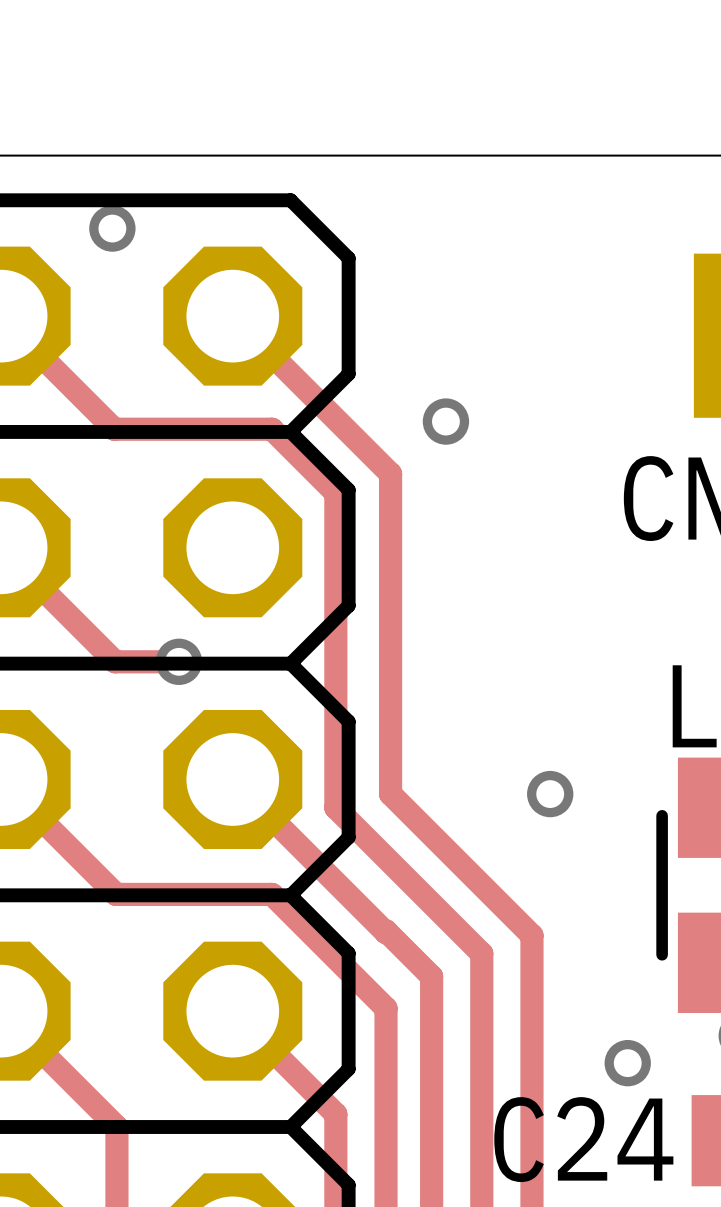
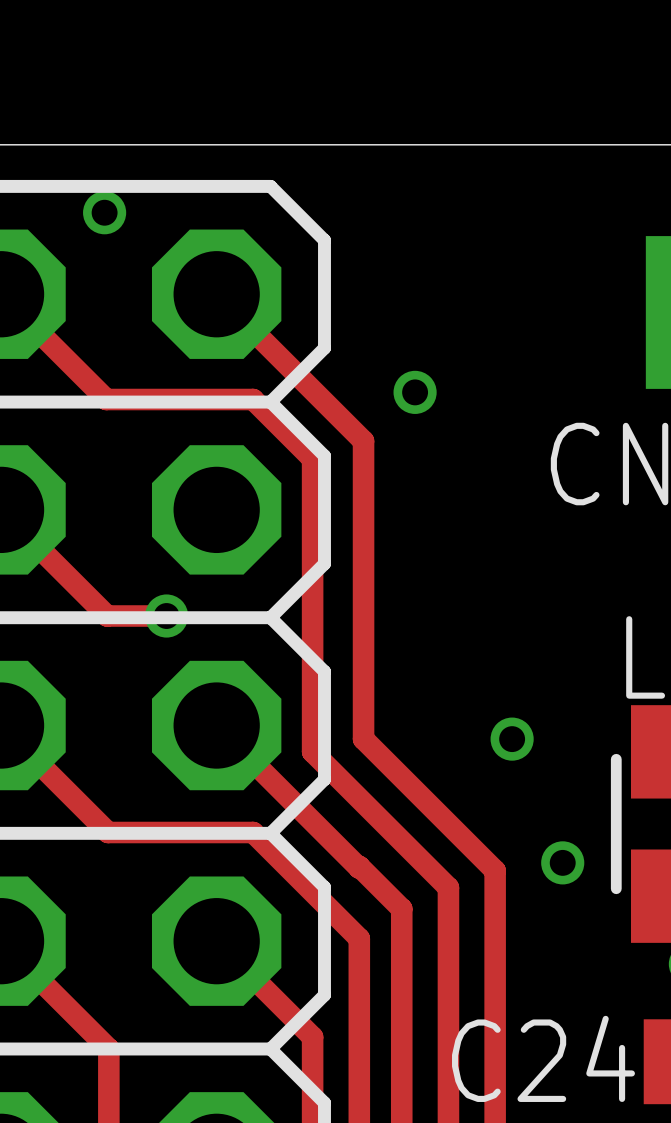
via position: (627, 1063) -> (562, 862)

